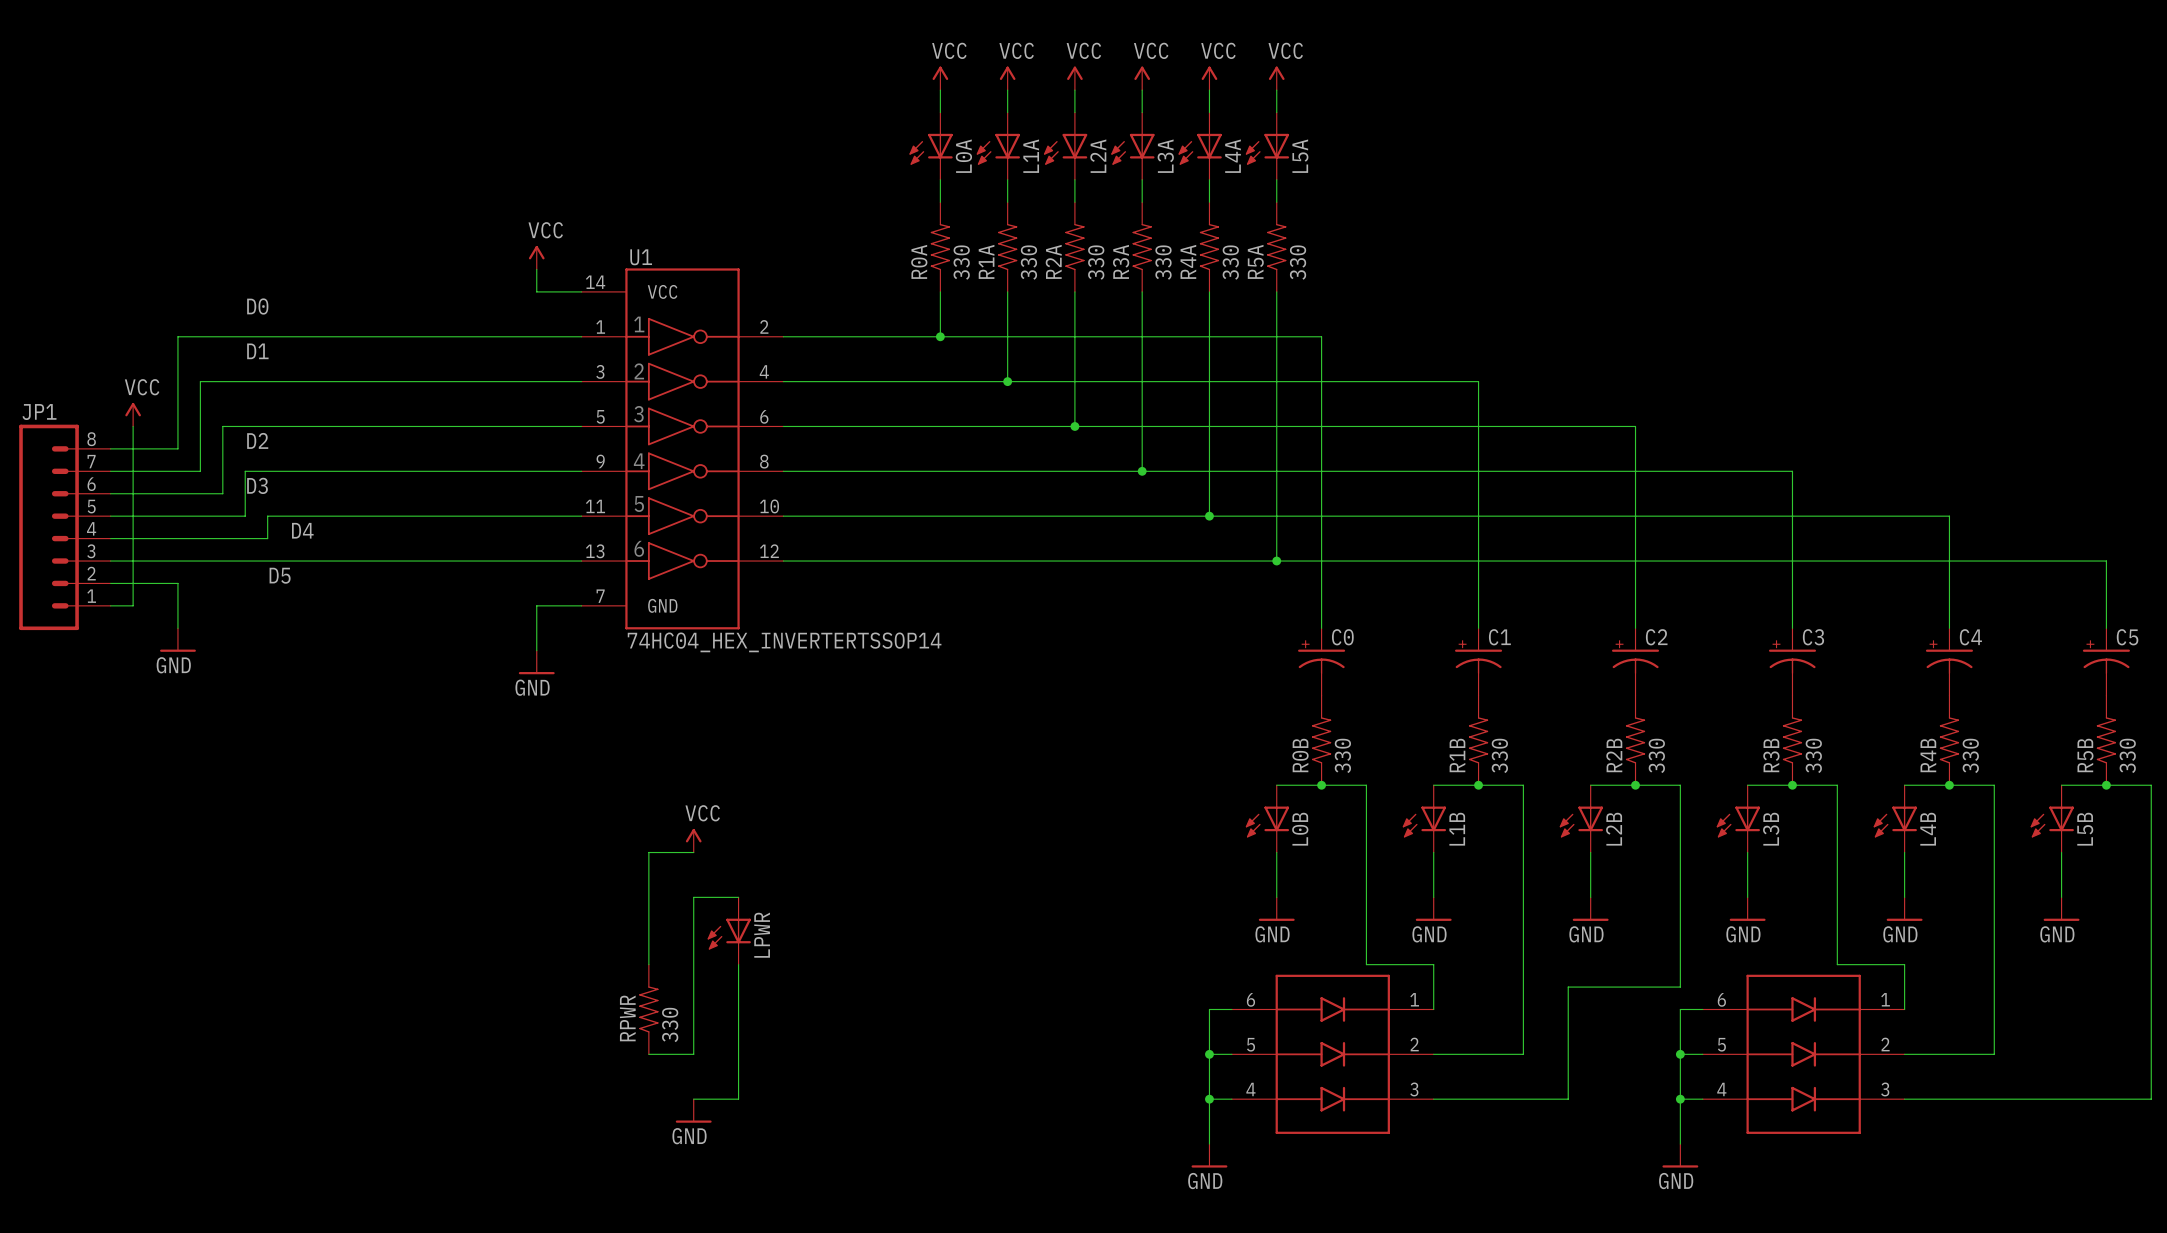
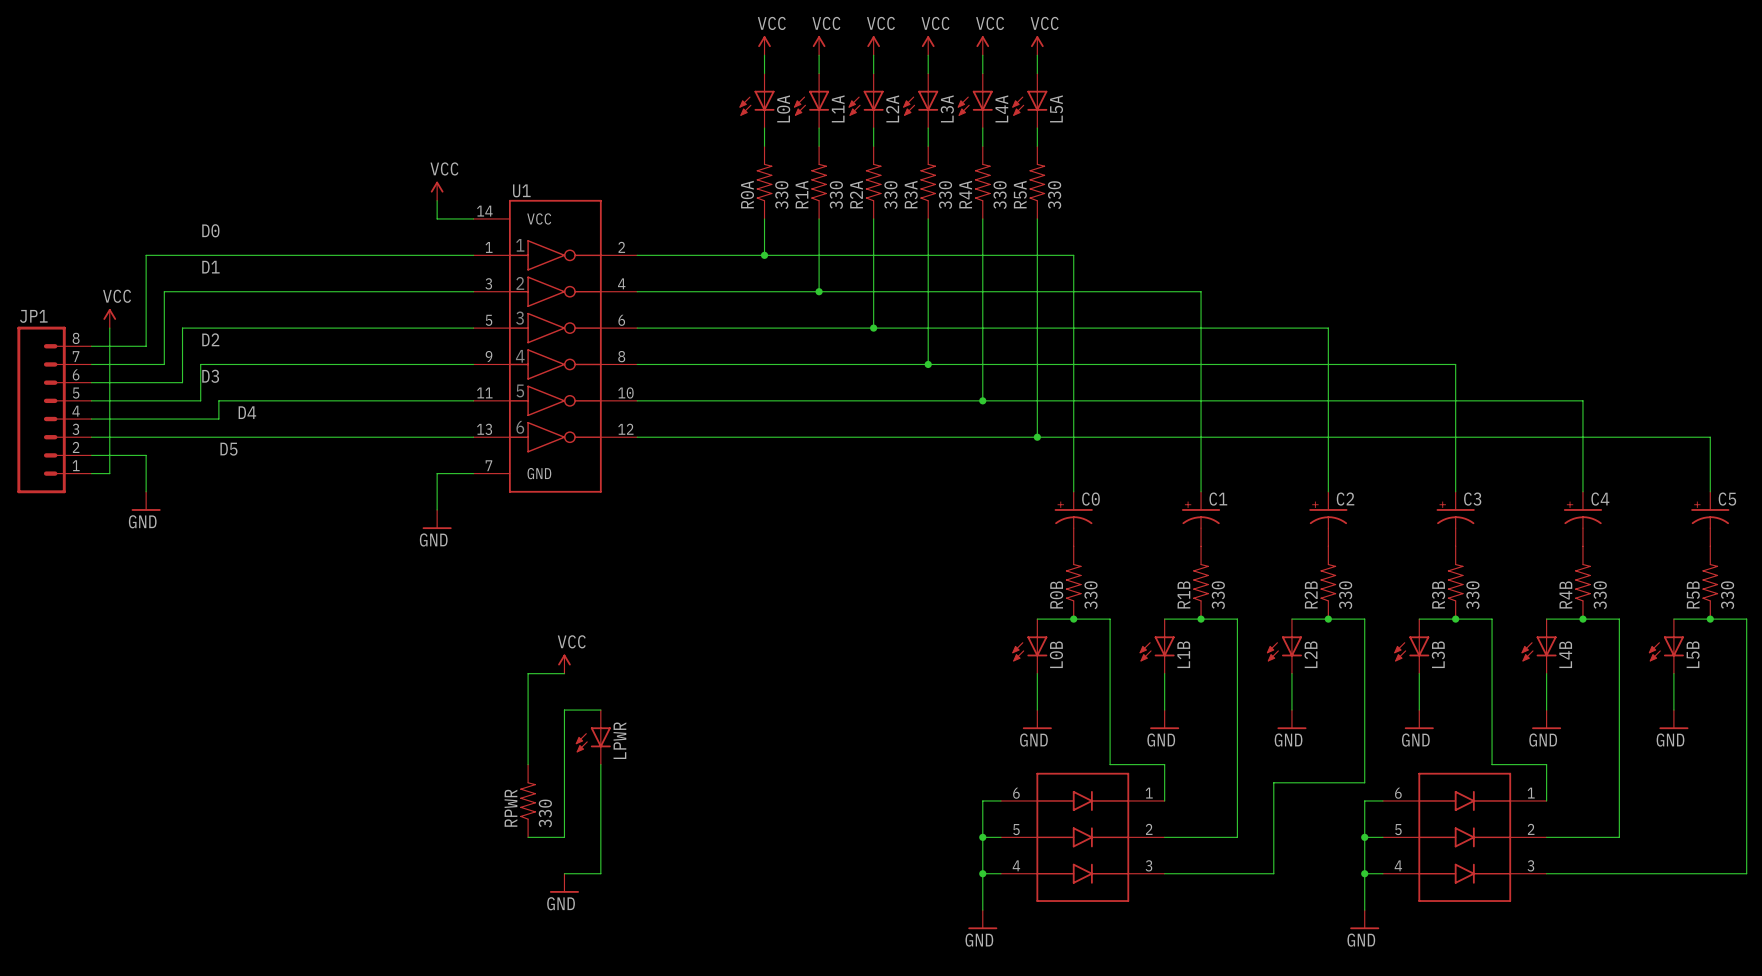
U1 value: 74HC04_HEX_INVERTERTSSOP14 (784, 642) -> none

